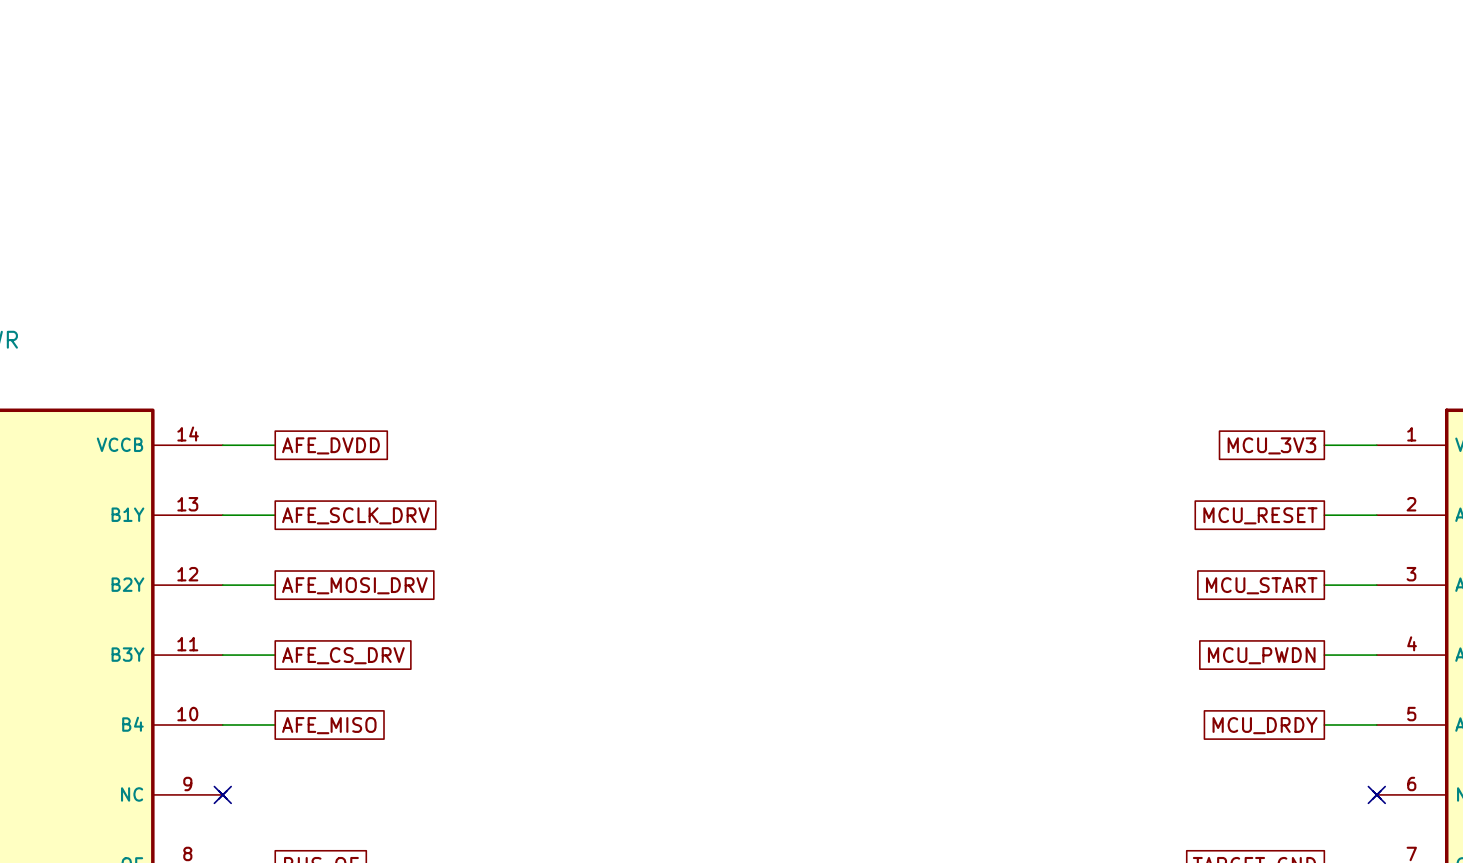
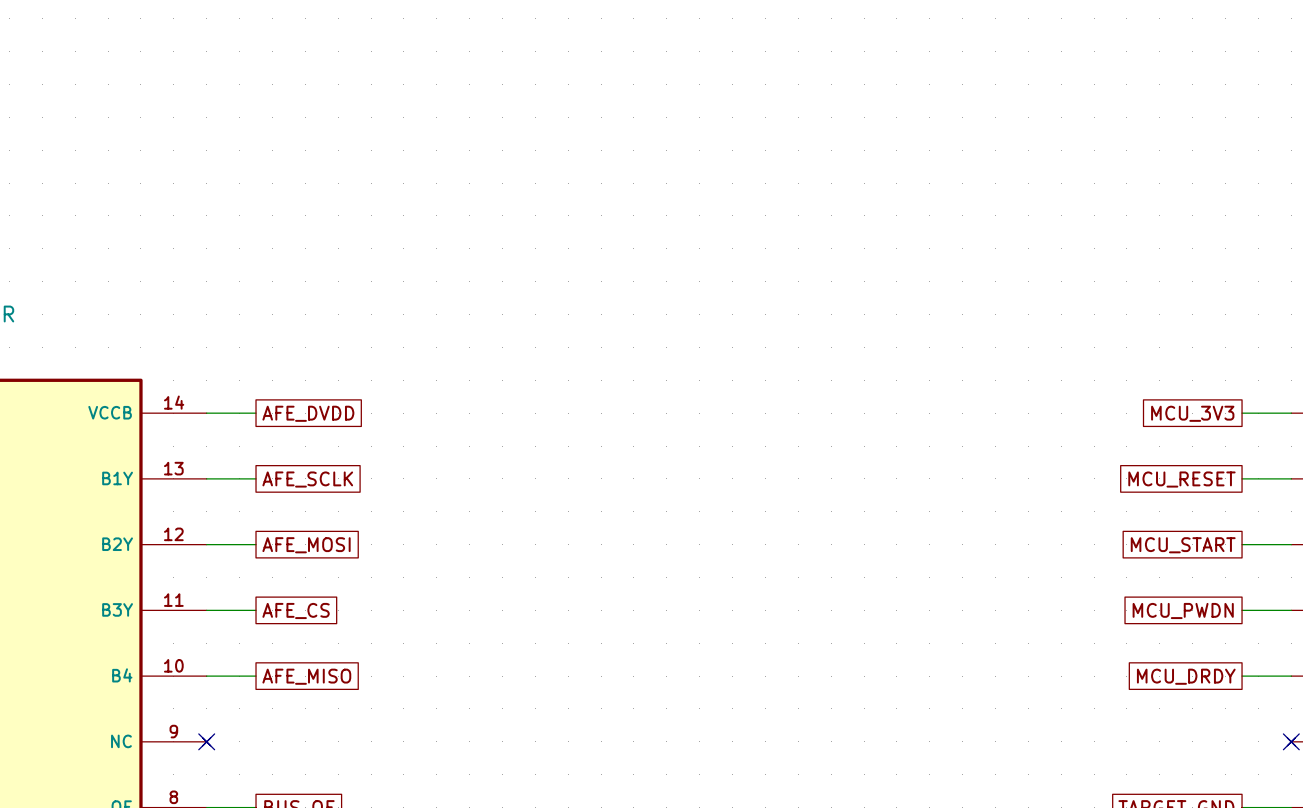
global label: AFE_SCLK_DRV (355, 515) -> AFE_SCLK (307, 479)
global label: AFE_MOSI_DRV (354, 585) -> AFE_MOSI (306, 545)
global label: AFE_CS_DRV (343, 655) -> AFE_CS (296, 610)

